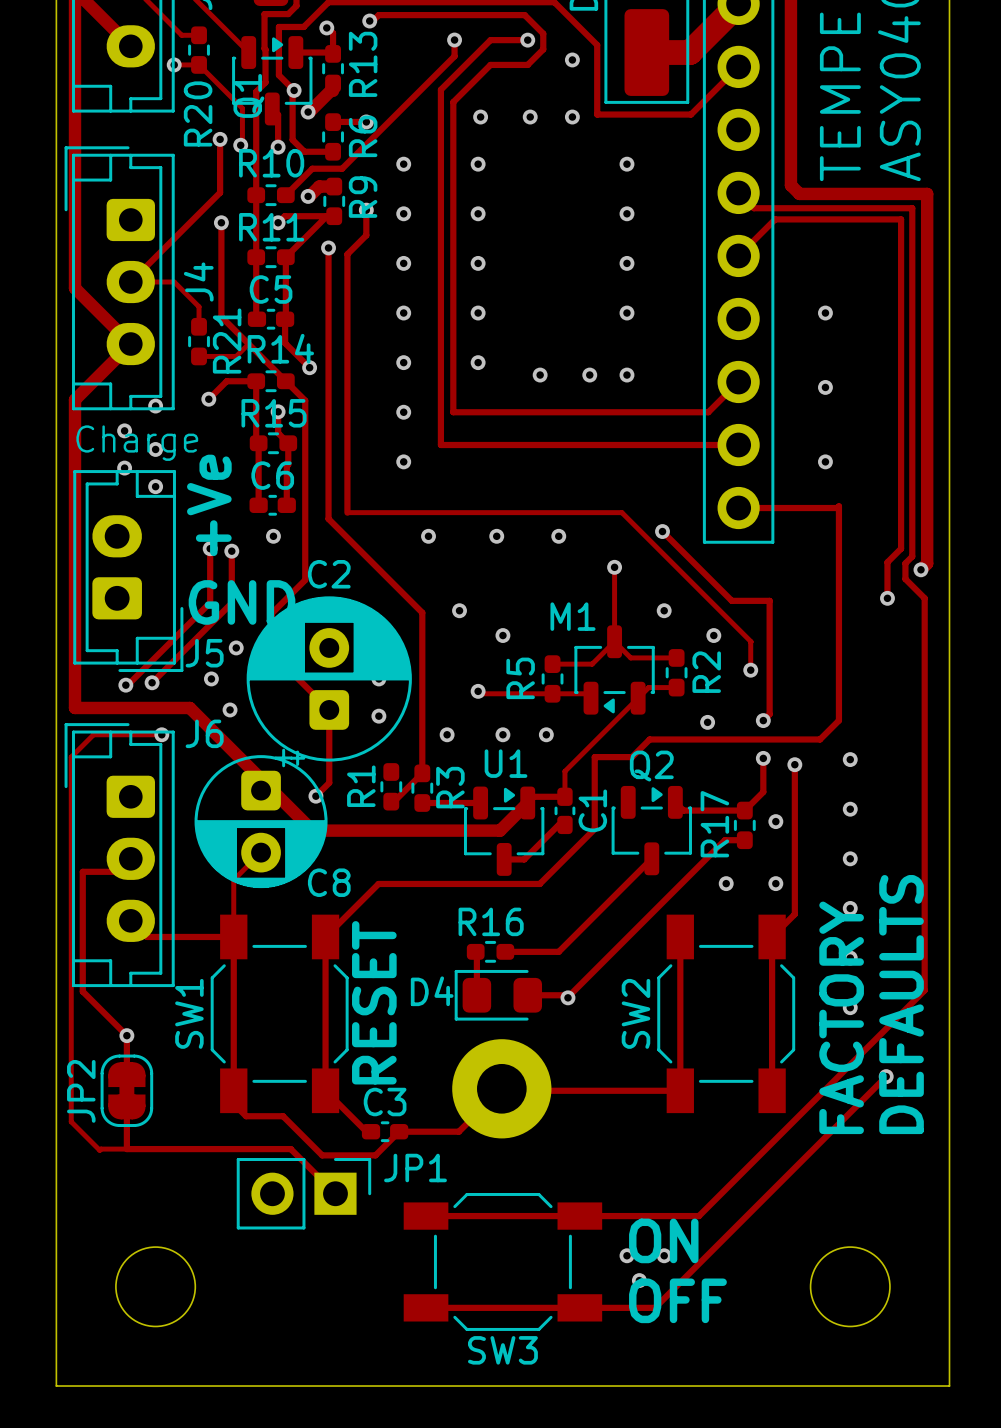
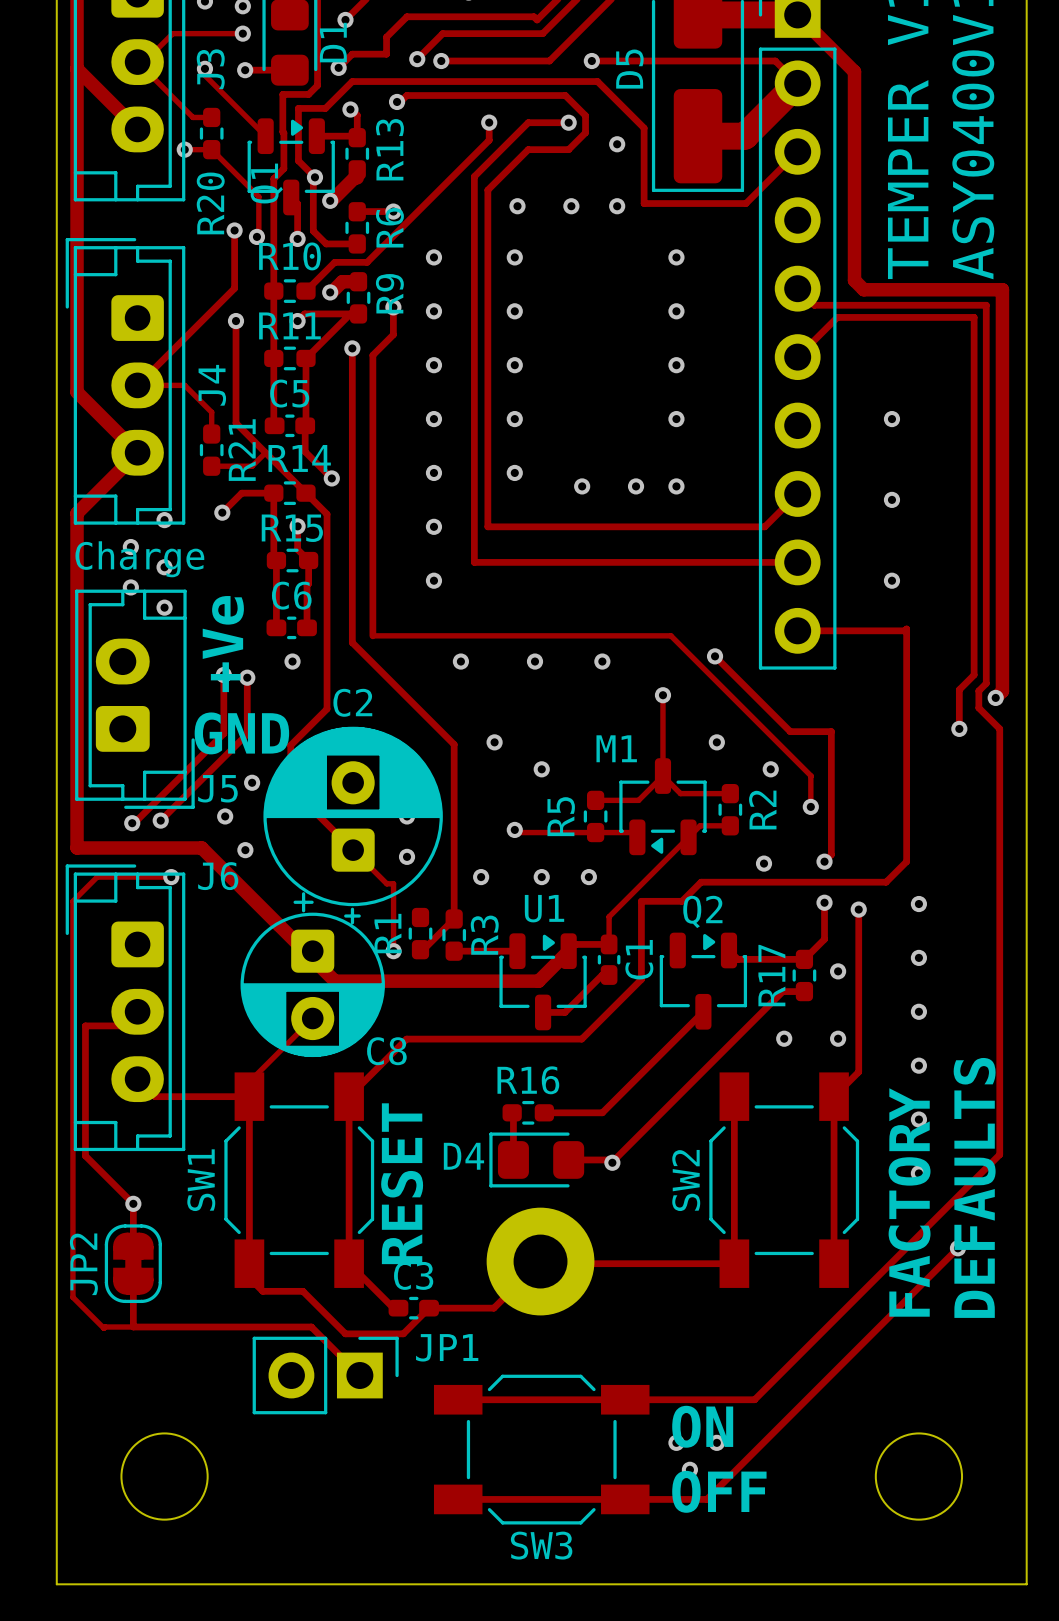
track: (329, 709) (329, 782) (315, 796) -> (353, 850) (386, 883) (393, 883) (393, 951)
via position: (315, 796) -> (393, 951)
C8 position: (261, 819) -> (312, 982)
track: (261, 852) (233, 879) (233, 923) -> (312, 1018) (249, 1081)

